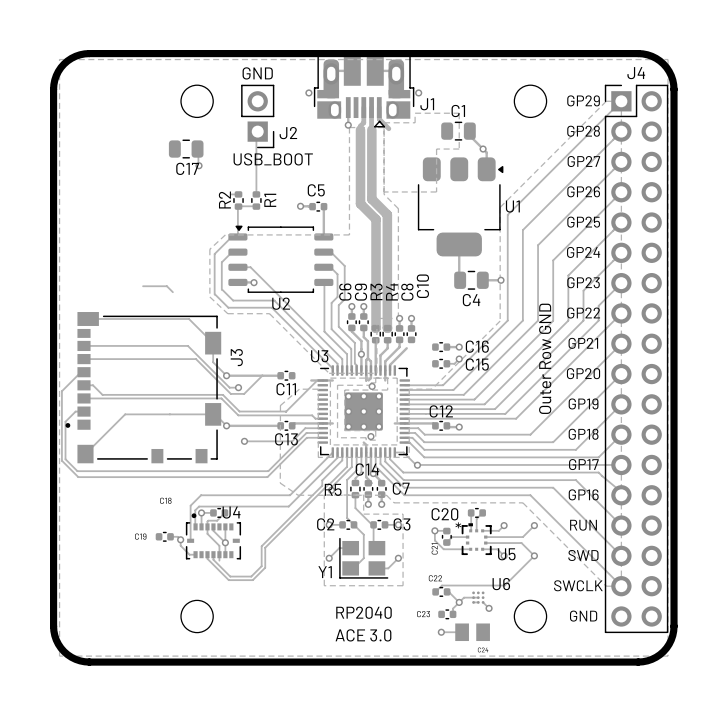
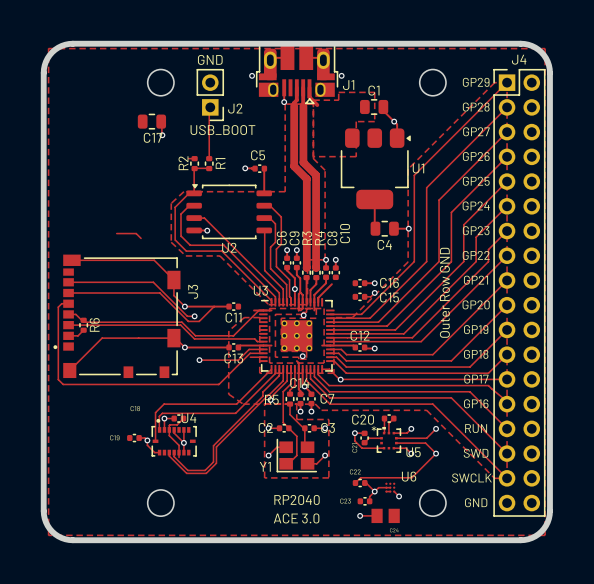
track: (80, 372) (61, 391) (61, 460) (78, 477) (267, 477) (306, 437) -> none
R6: none -> (83, 325)
track: none -> (83, 330) (78, 335) (68, 335)
track: (84, 411) (75, 411) (65, 421) (65, 459) (71, 465) -> (66, 303) (61, 303) (58, 307) (58, 379)

